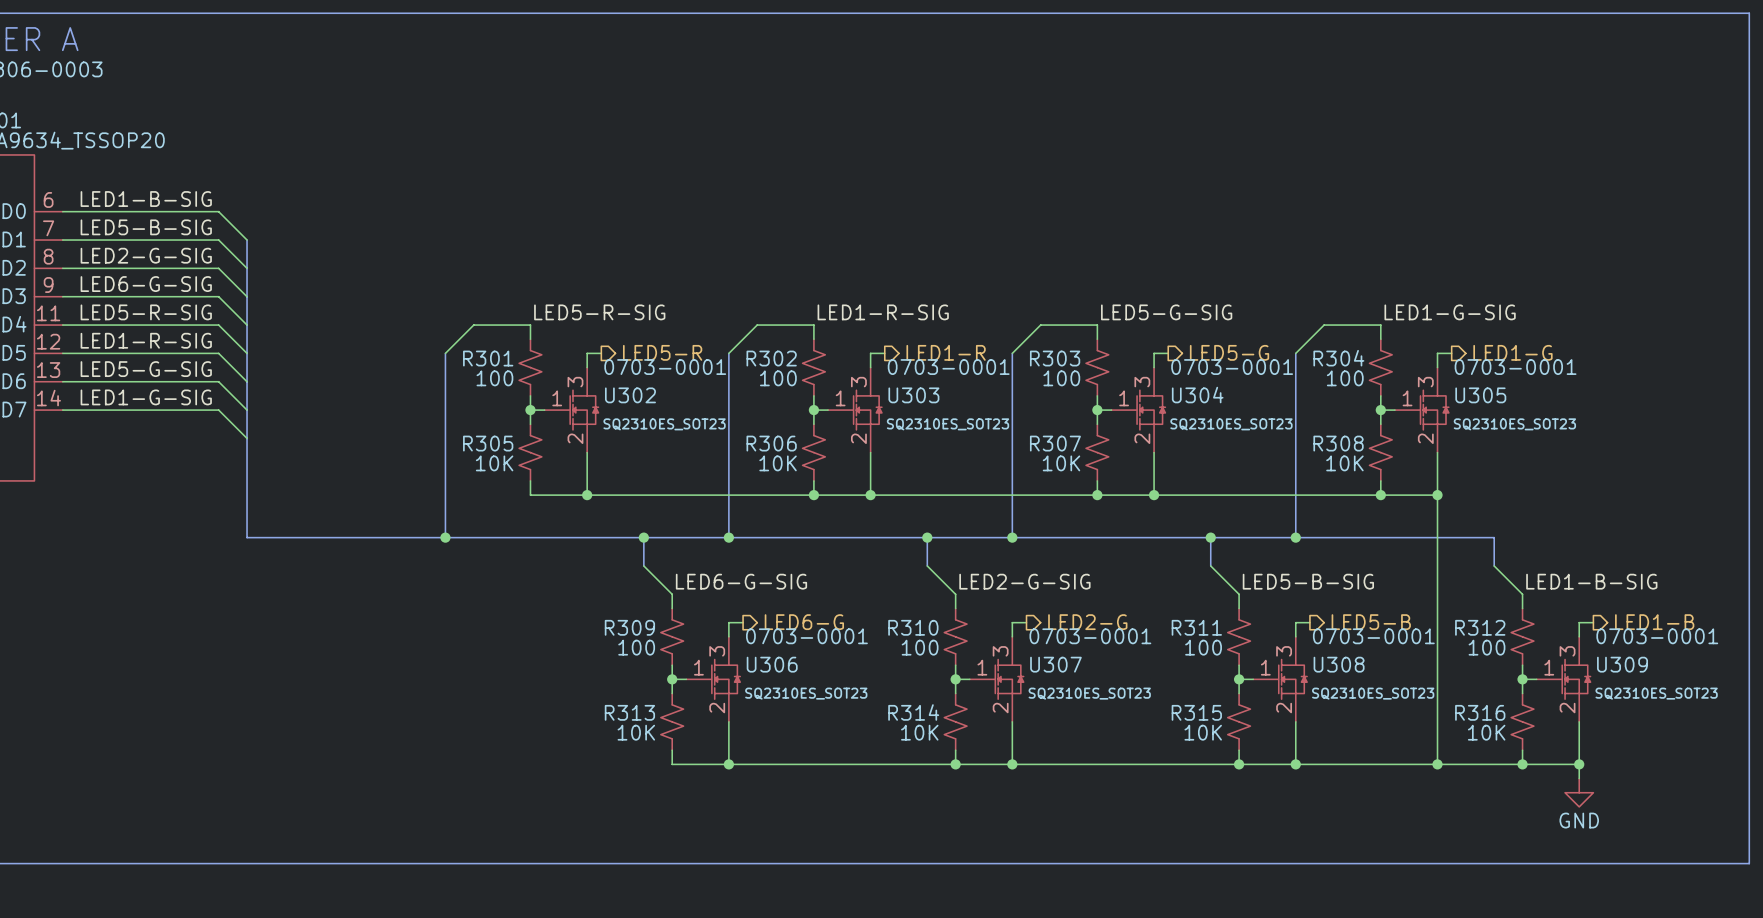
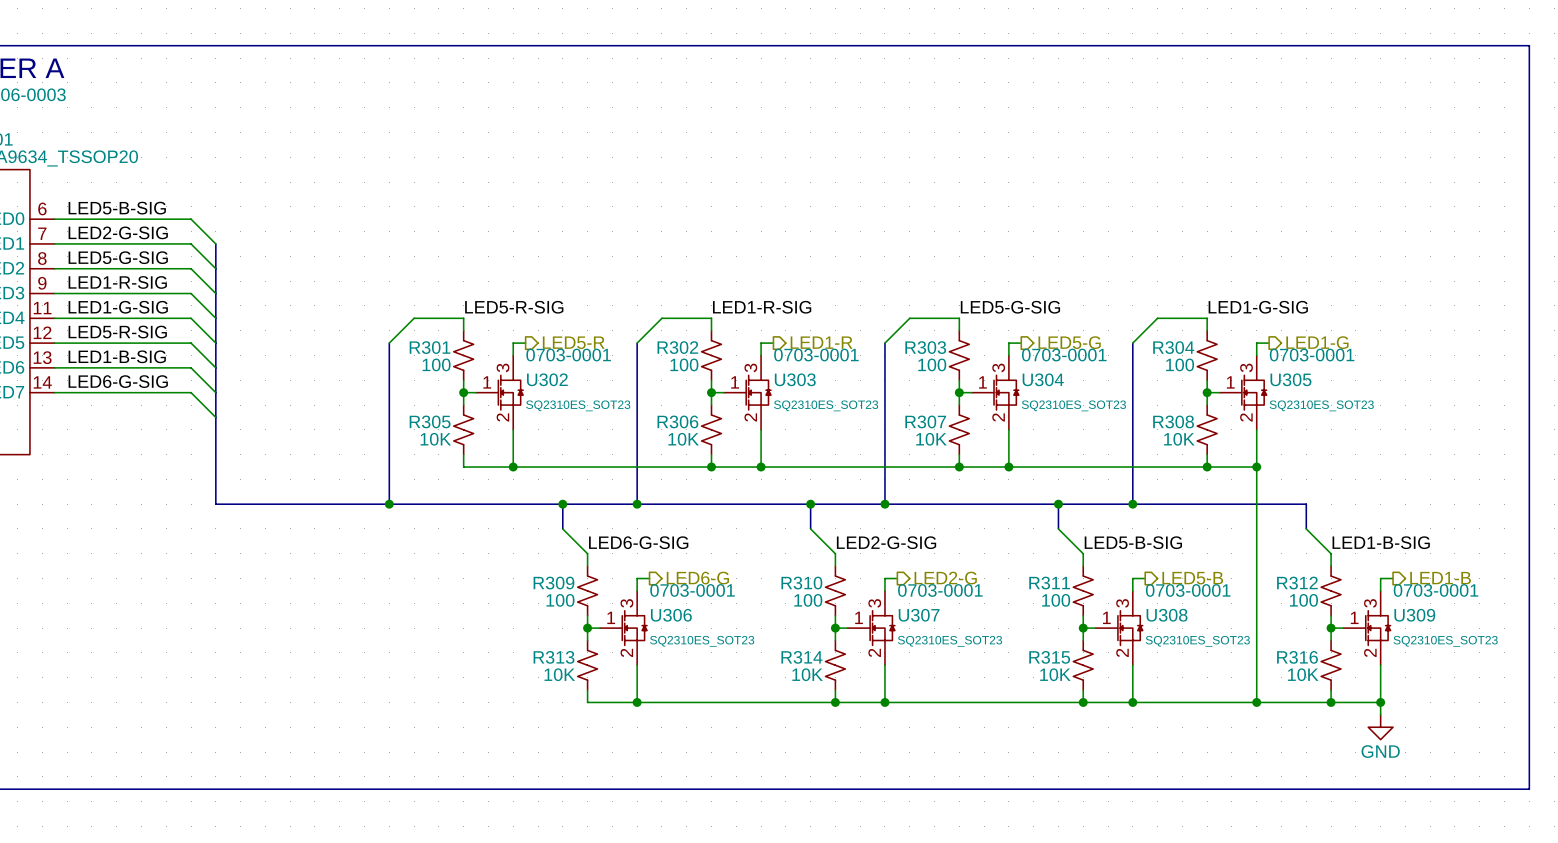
label: LED1-B-SIG (146, 199) -> LED5-B-SIG (117, 208)
label: LED5-B-SIG (146, 227) -> LED2-G-SIG (118, 232)
label: LED2-G-SIG (146, 255) -> LED5-G-SIG (118, 257)
label: LED6-G-SIG (146, 284) -> LED1-R-SIG (117, 282)
label: LED5-R-SIG (146, 312) -> LED1-G-SIG (118, 307)
label: LED1-R-SIG (146, 340) -> LED5-R-SIG (117, 332)
label: LED5-G-SIG (146, 369) -> LED1-B-SIG (117, 356)
label: LED1-G-SIG (146, 397) -> LED6-G-SIG (118, 381)

